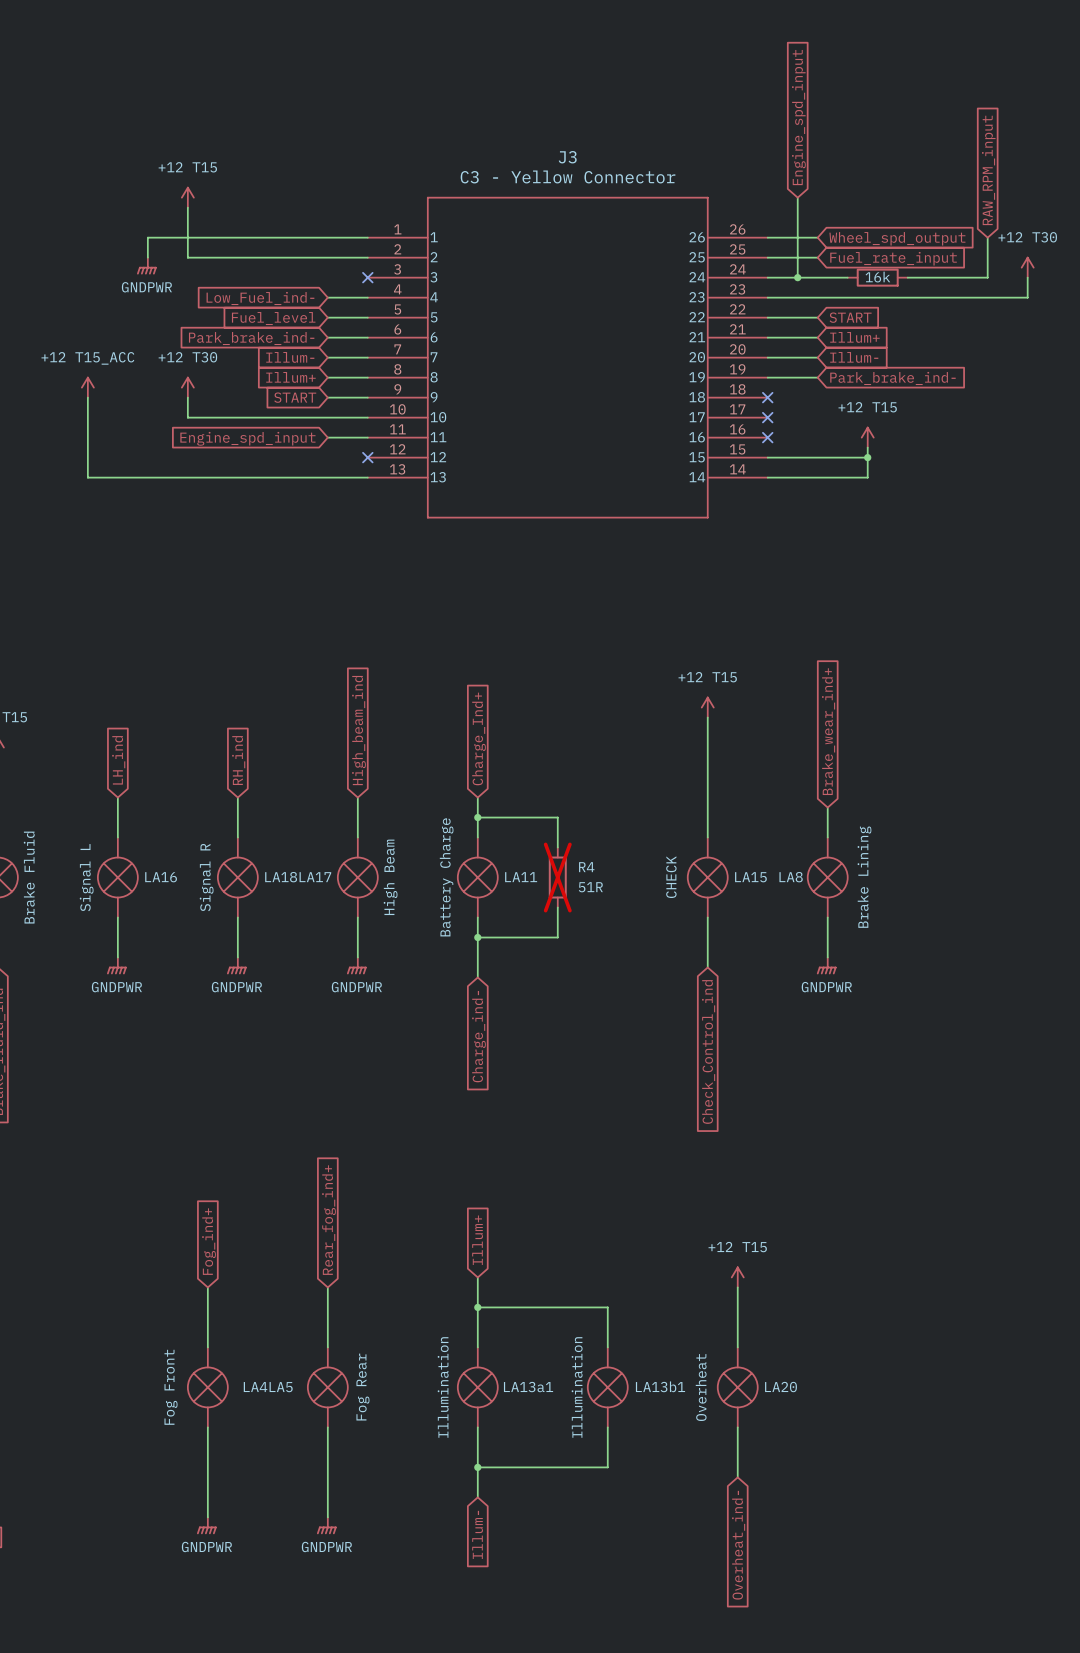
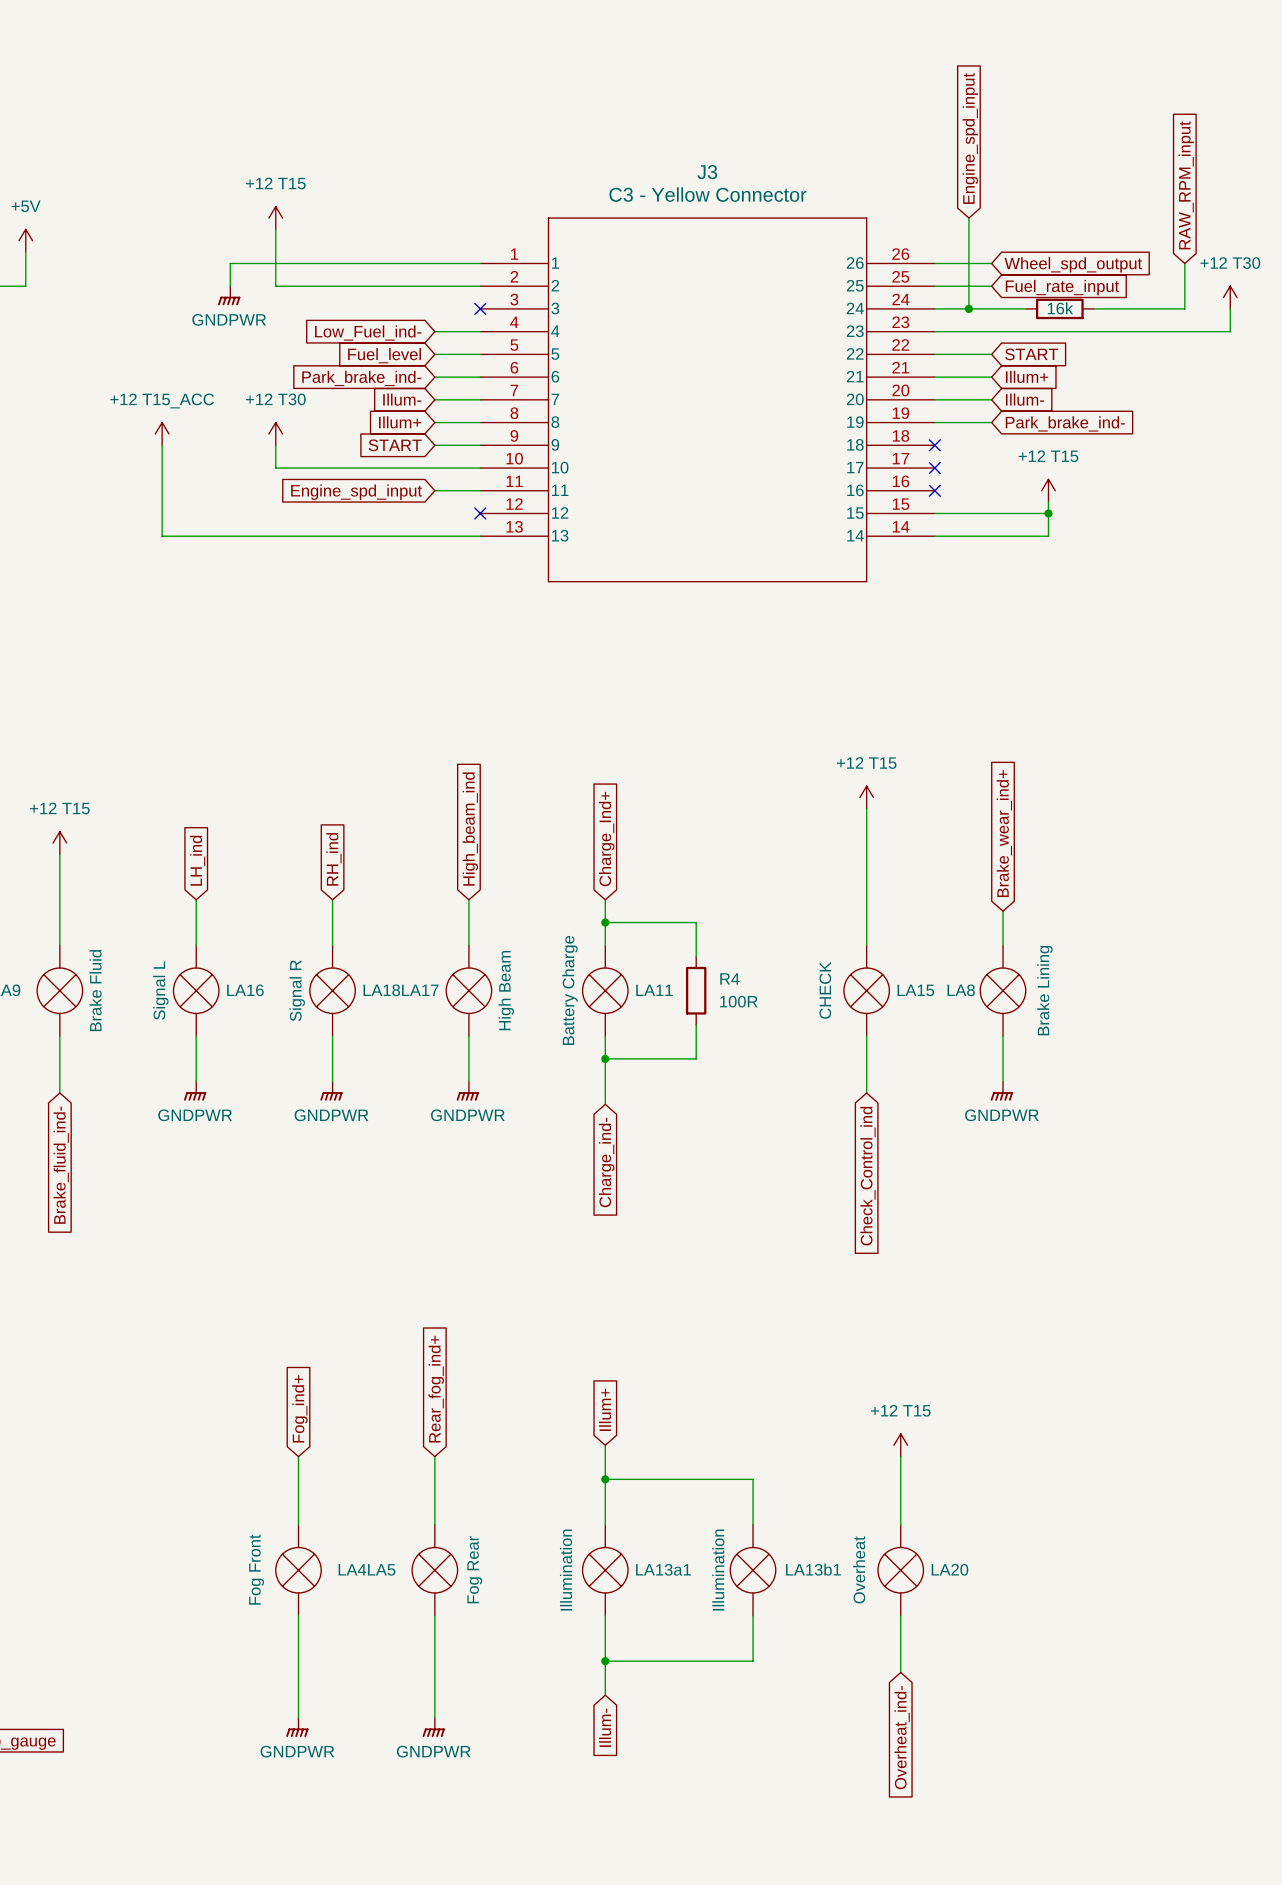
R4 do-not-place cross: (557, 877) -> none
R4 value: 51R (590, 887) -> 100R (738, 1001)

